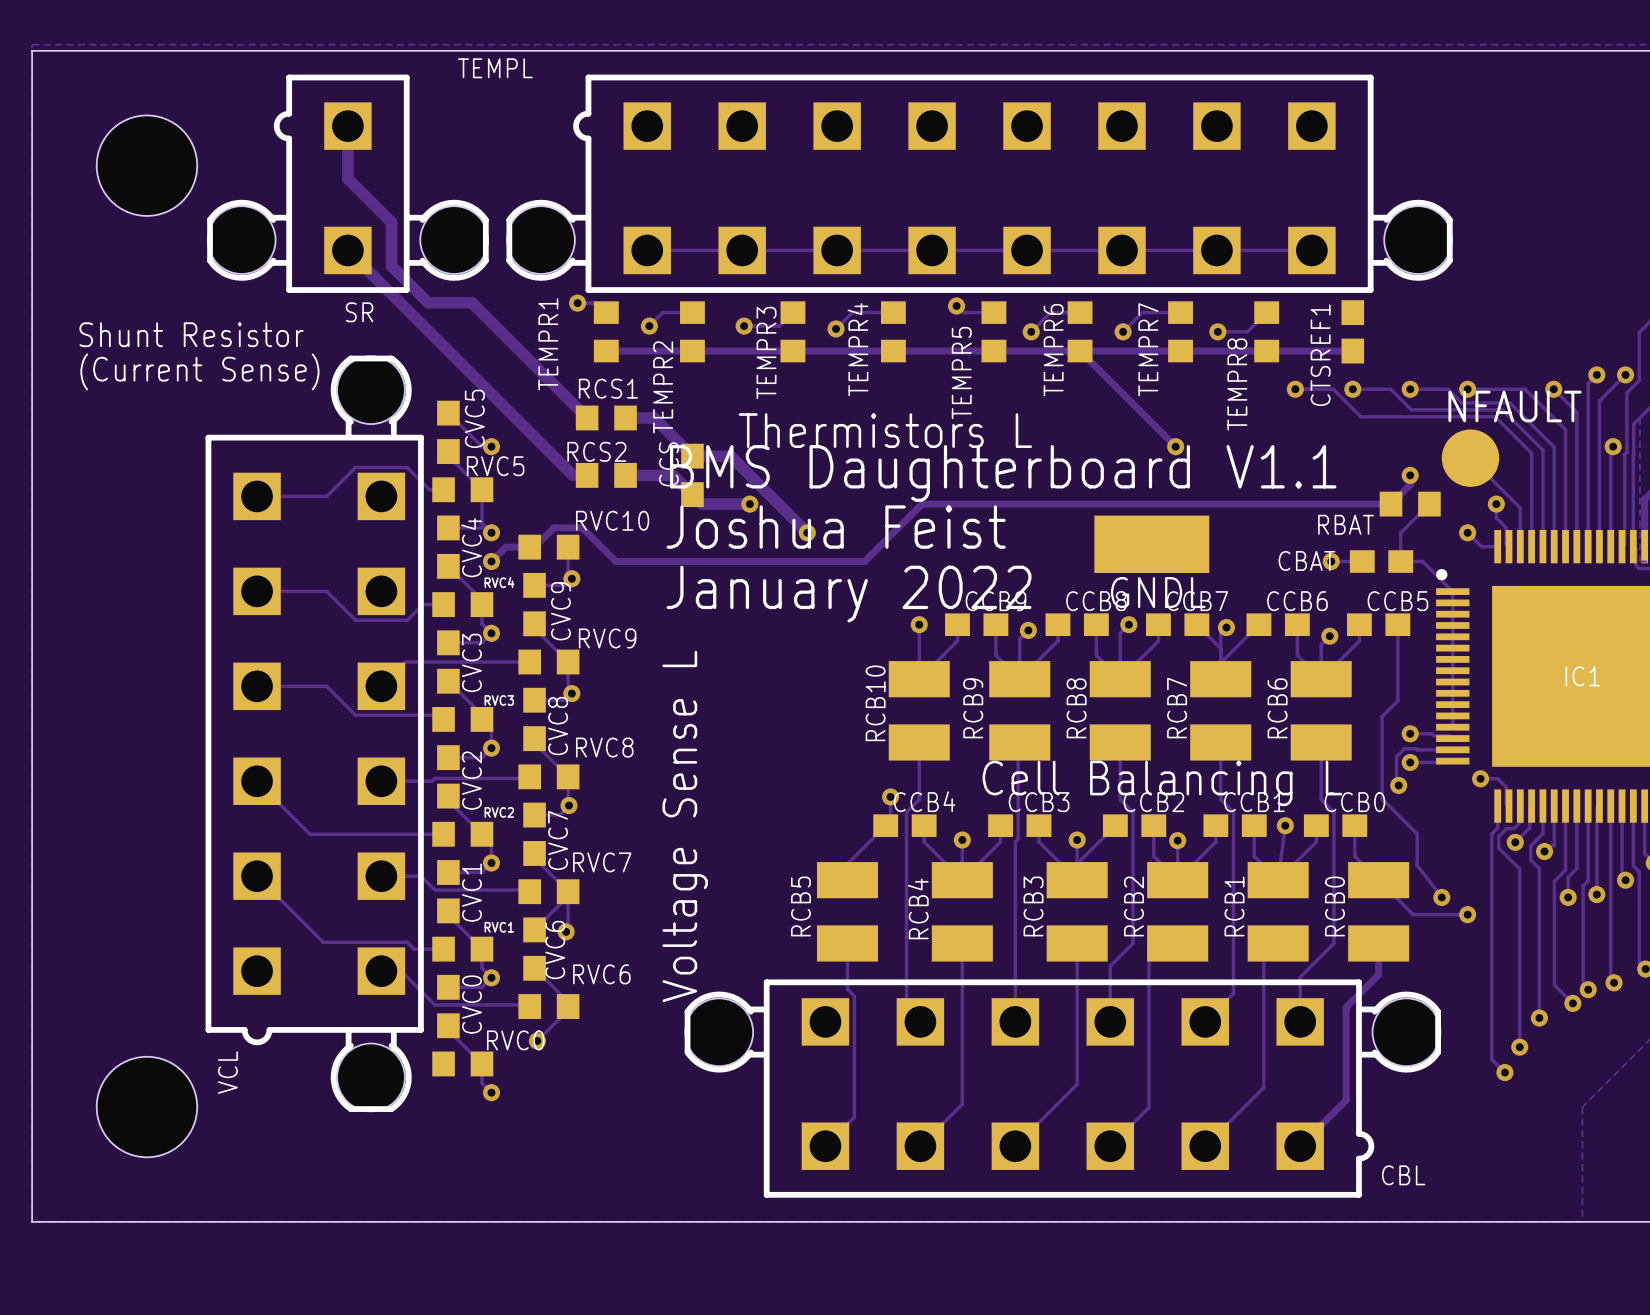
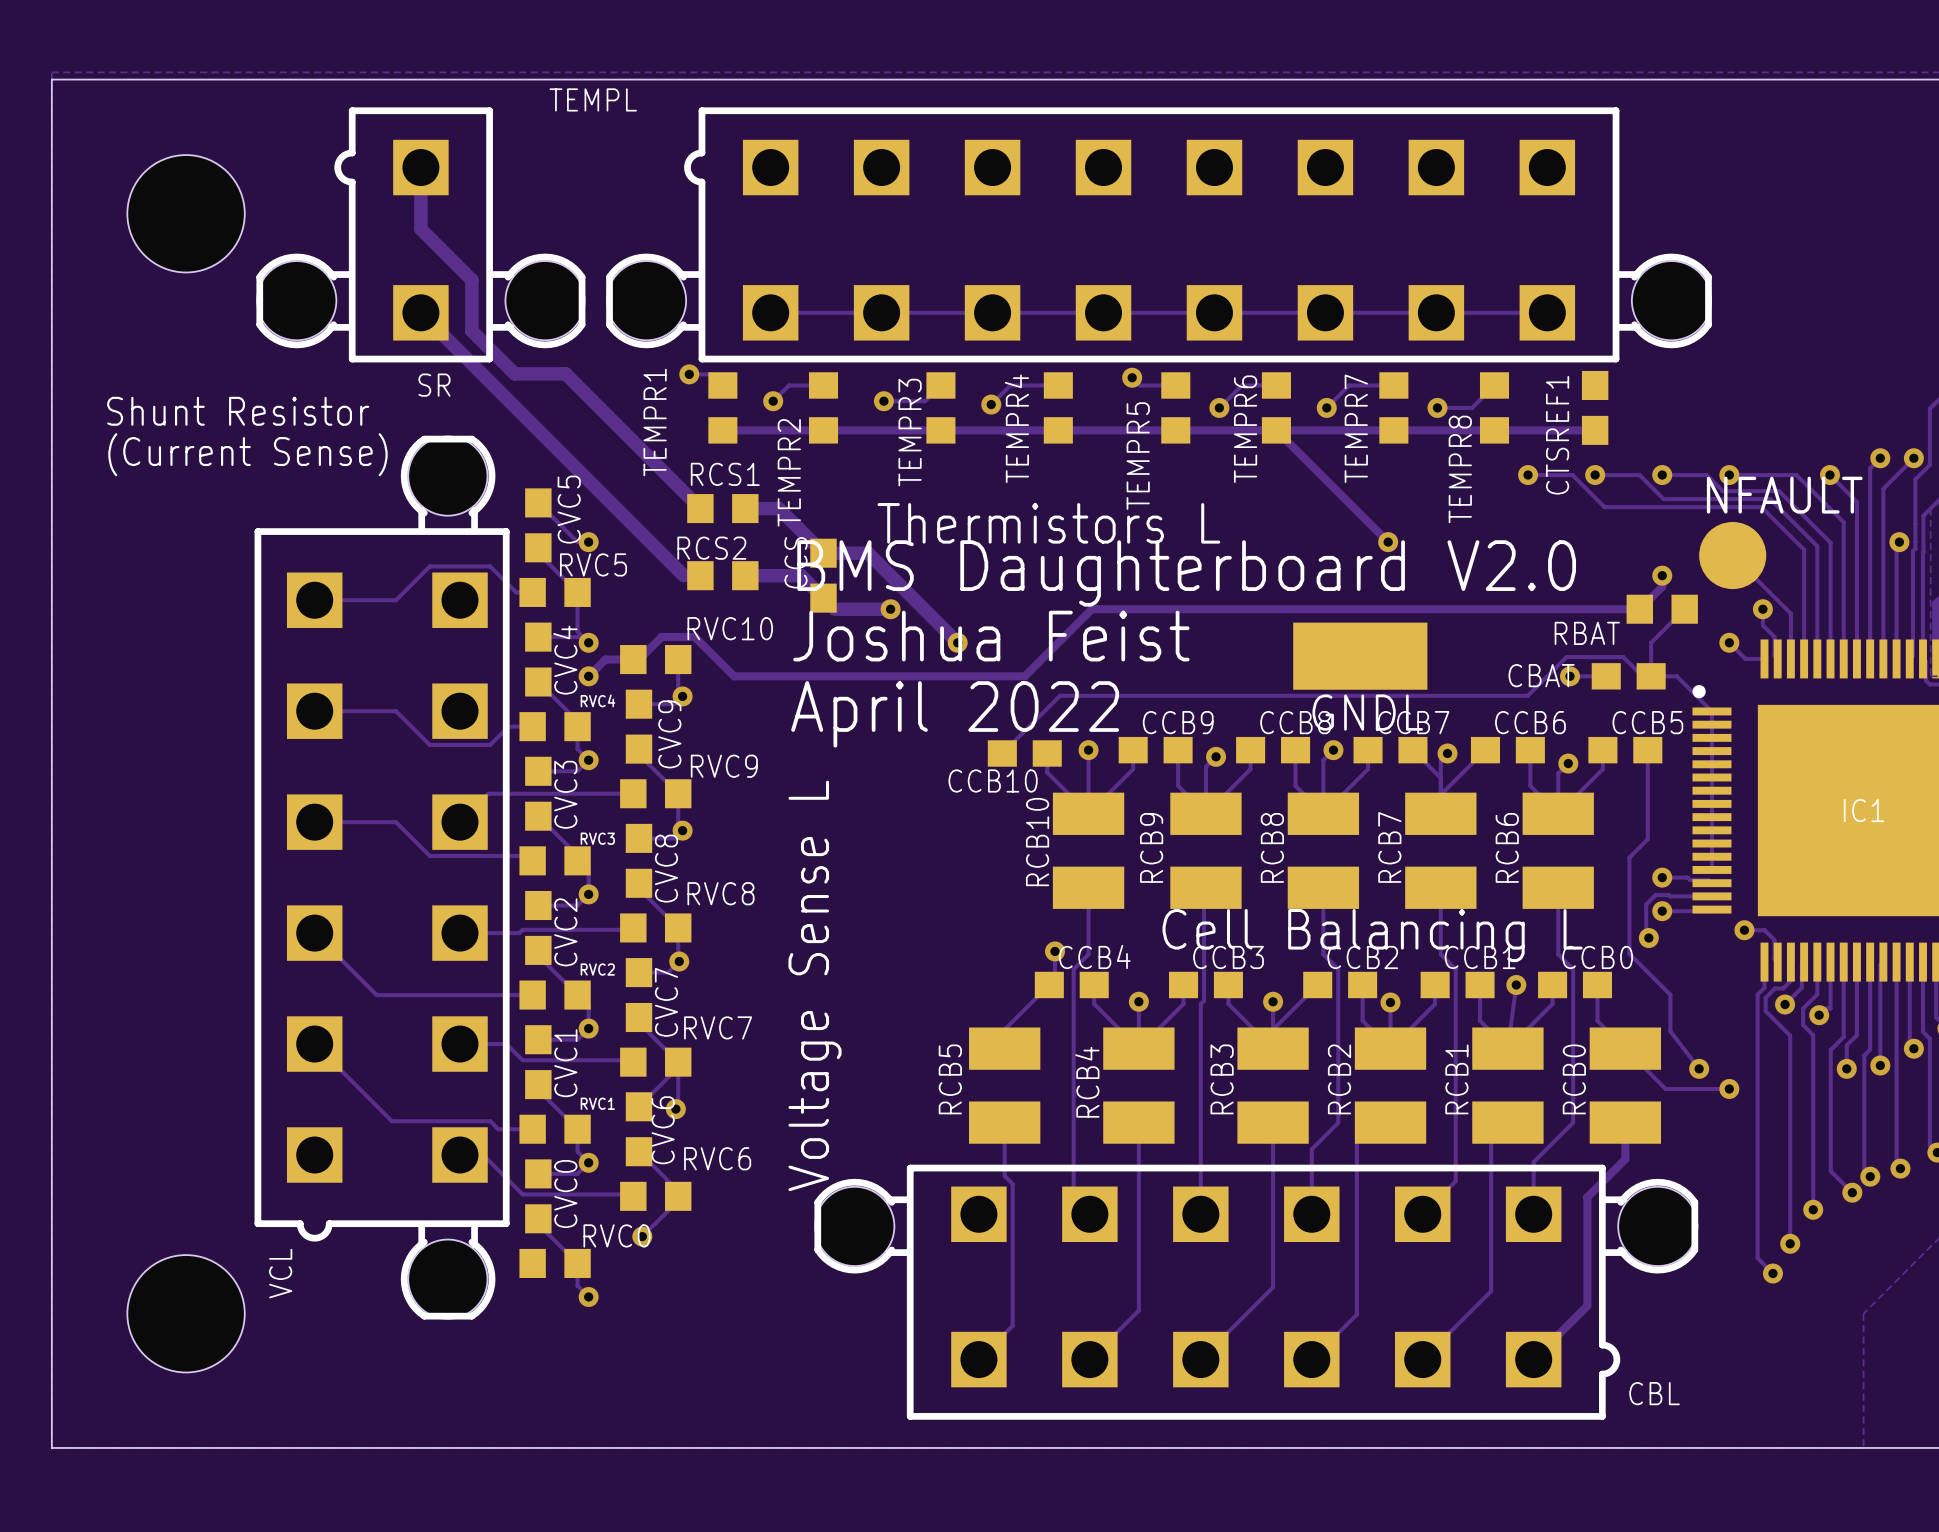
text: BMS Daughterboard V1.1 (1003, 473) -> BMS Daughterboard V2.0 (1186, 573)
track: none -> (1651, 676) (1642, 676) (1623, 657) (1566, 657) (1527, 695) (1060, 695) (1002, 753)
text: January 2022 (849, 594) -> April 2022 (955, 714)
CCB10: none -> (1024, 753)
track: none -> (1047, 753) (1047, 772) (1088, 813)

